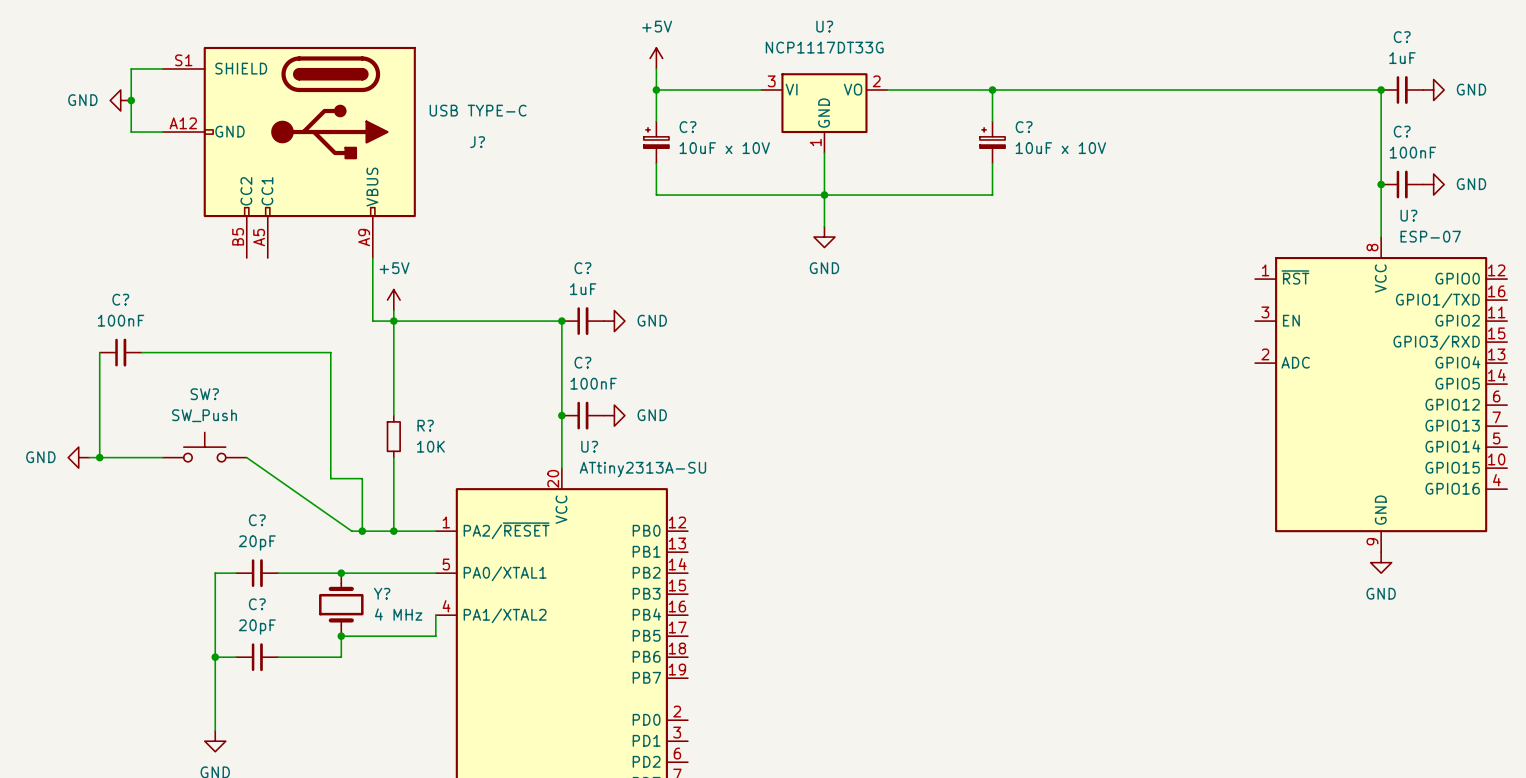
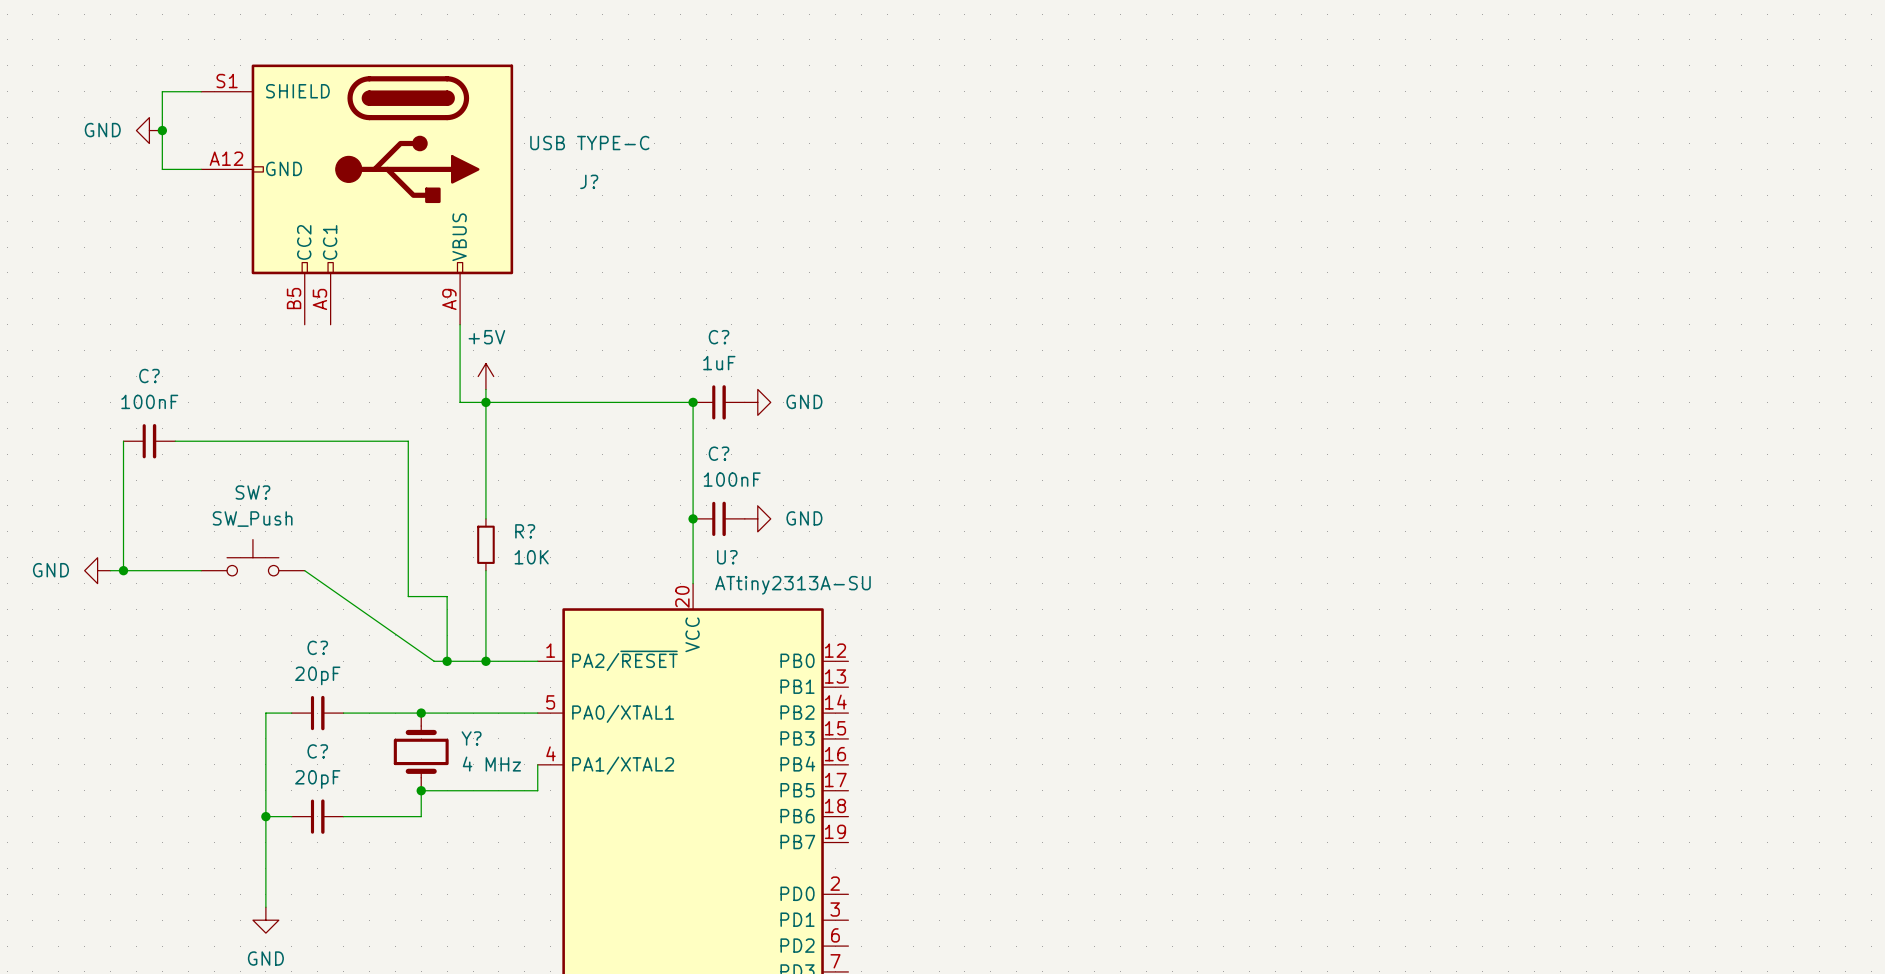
power symbol: +5V (656, 58) -> none
wire: (656, 68) (656, 121) -> none
wire: (656, 90) (761, 90) -> none
junction: (656, 90) -> none
wire: (887, 90) (1381, 90) (1381, 237) -> none
wire: (992, 90) (992, 121) -> none
junction: (992, 90) -> none
junction: (1381, 90) -> none
C?: 1uF (1402, 90) -> none
power symbol: GND (1433, 90) -> none
U?: NCP1117DT33G (824, 113) -> none
C?: 10uF x 10V (656, 142) -> none
C?: 10uF x 10V (992, 142) -> none
wire: (824, 153) (824, 226) -> none
wire: (656, 163) (656, 195) (992, 195) (992, 163) -> none
junction: (1381, 184) -> none
C?: 100nF (1402, 184) -> none
power symbol: GND (1433, 184) -> none
junction: (824, 195) -> none
power symbol: GND (824, 237) -> none
U?: ESP-07 (1381, 394) -> none
power symbol: GND (1381, 562) -> none

